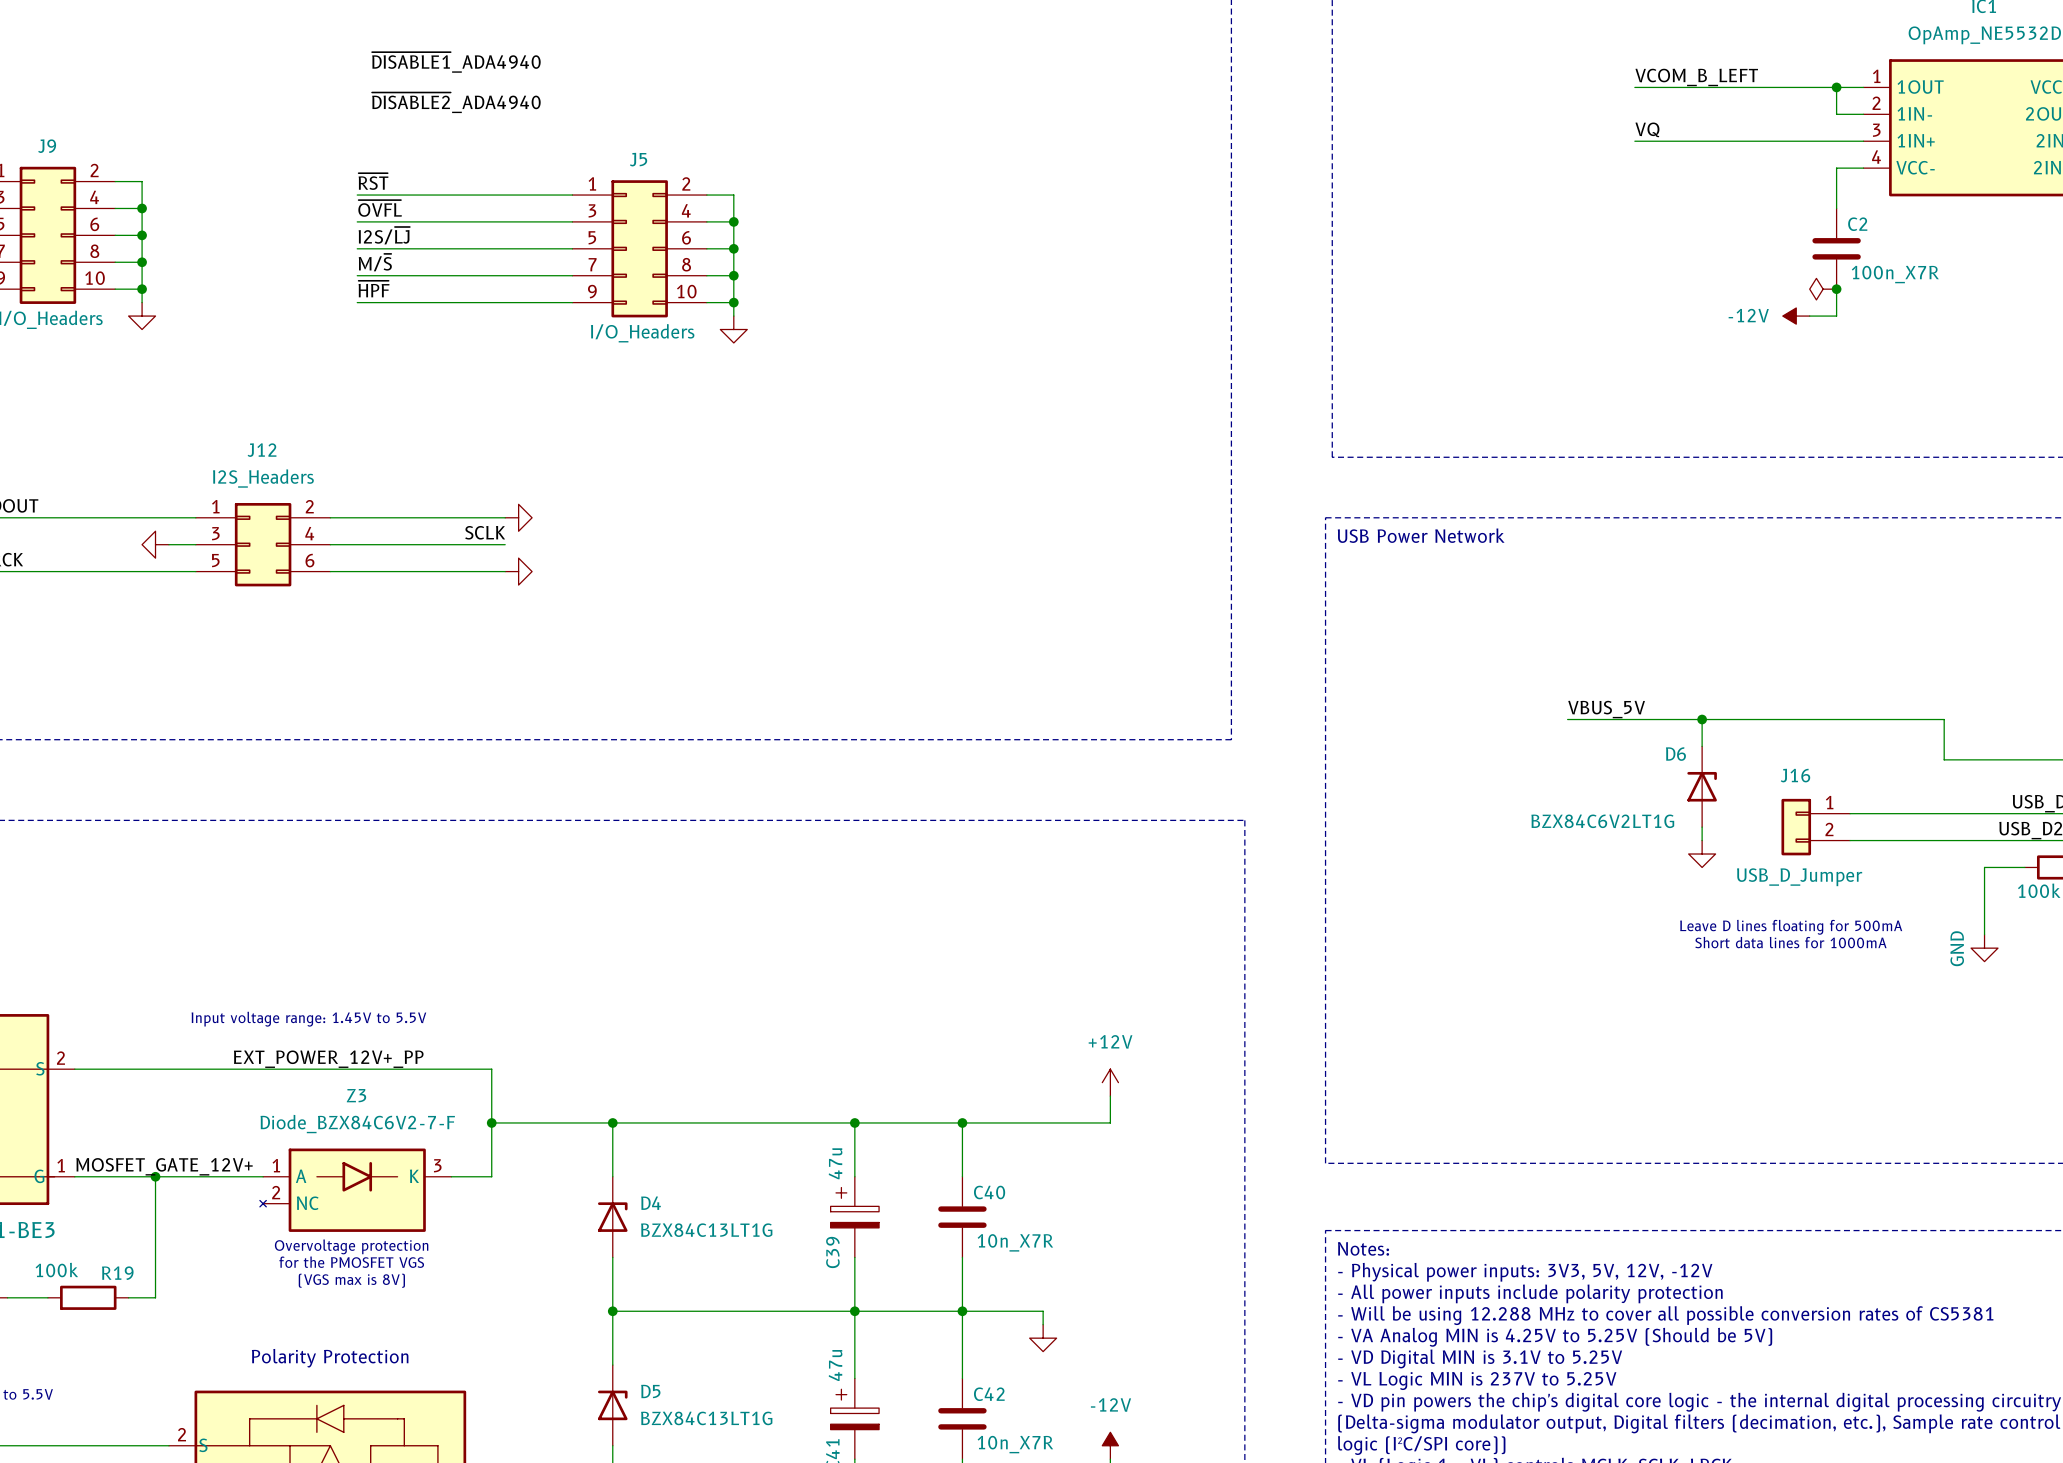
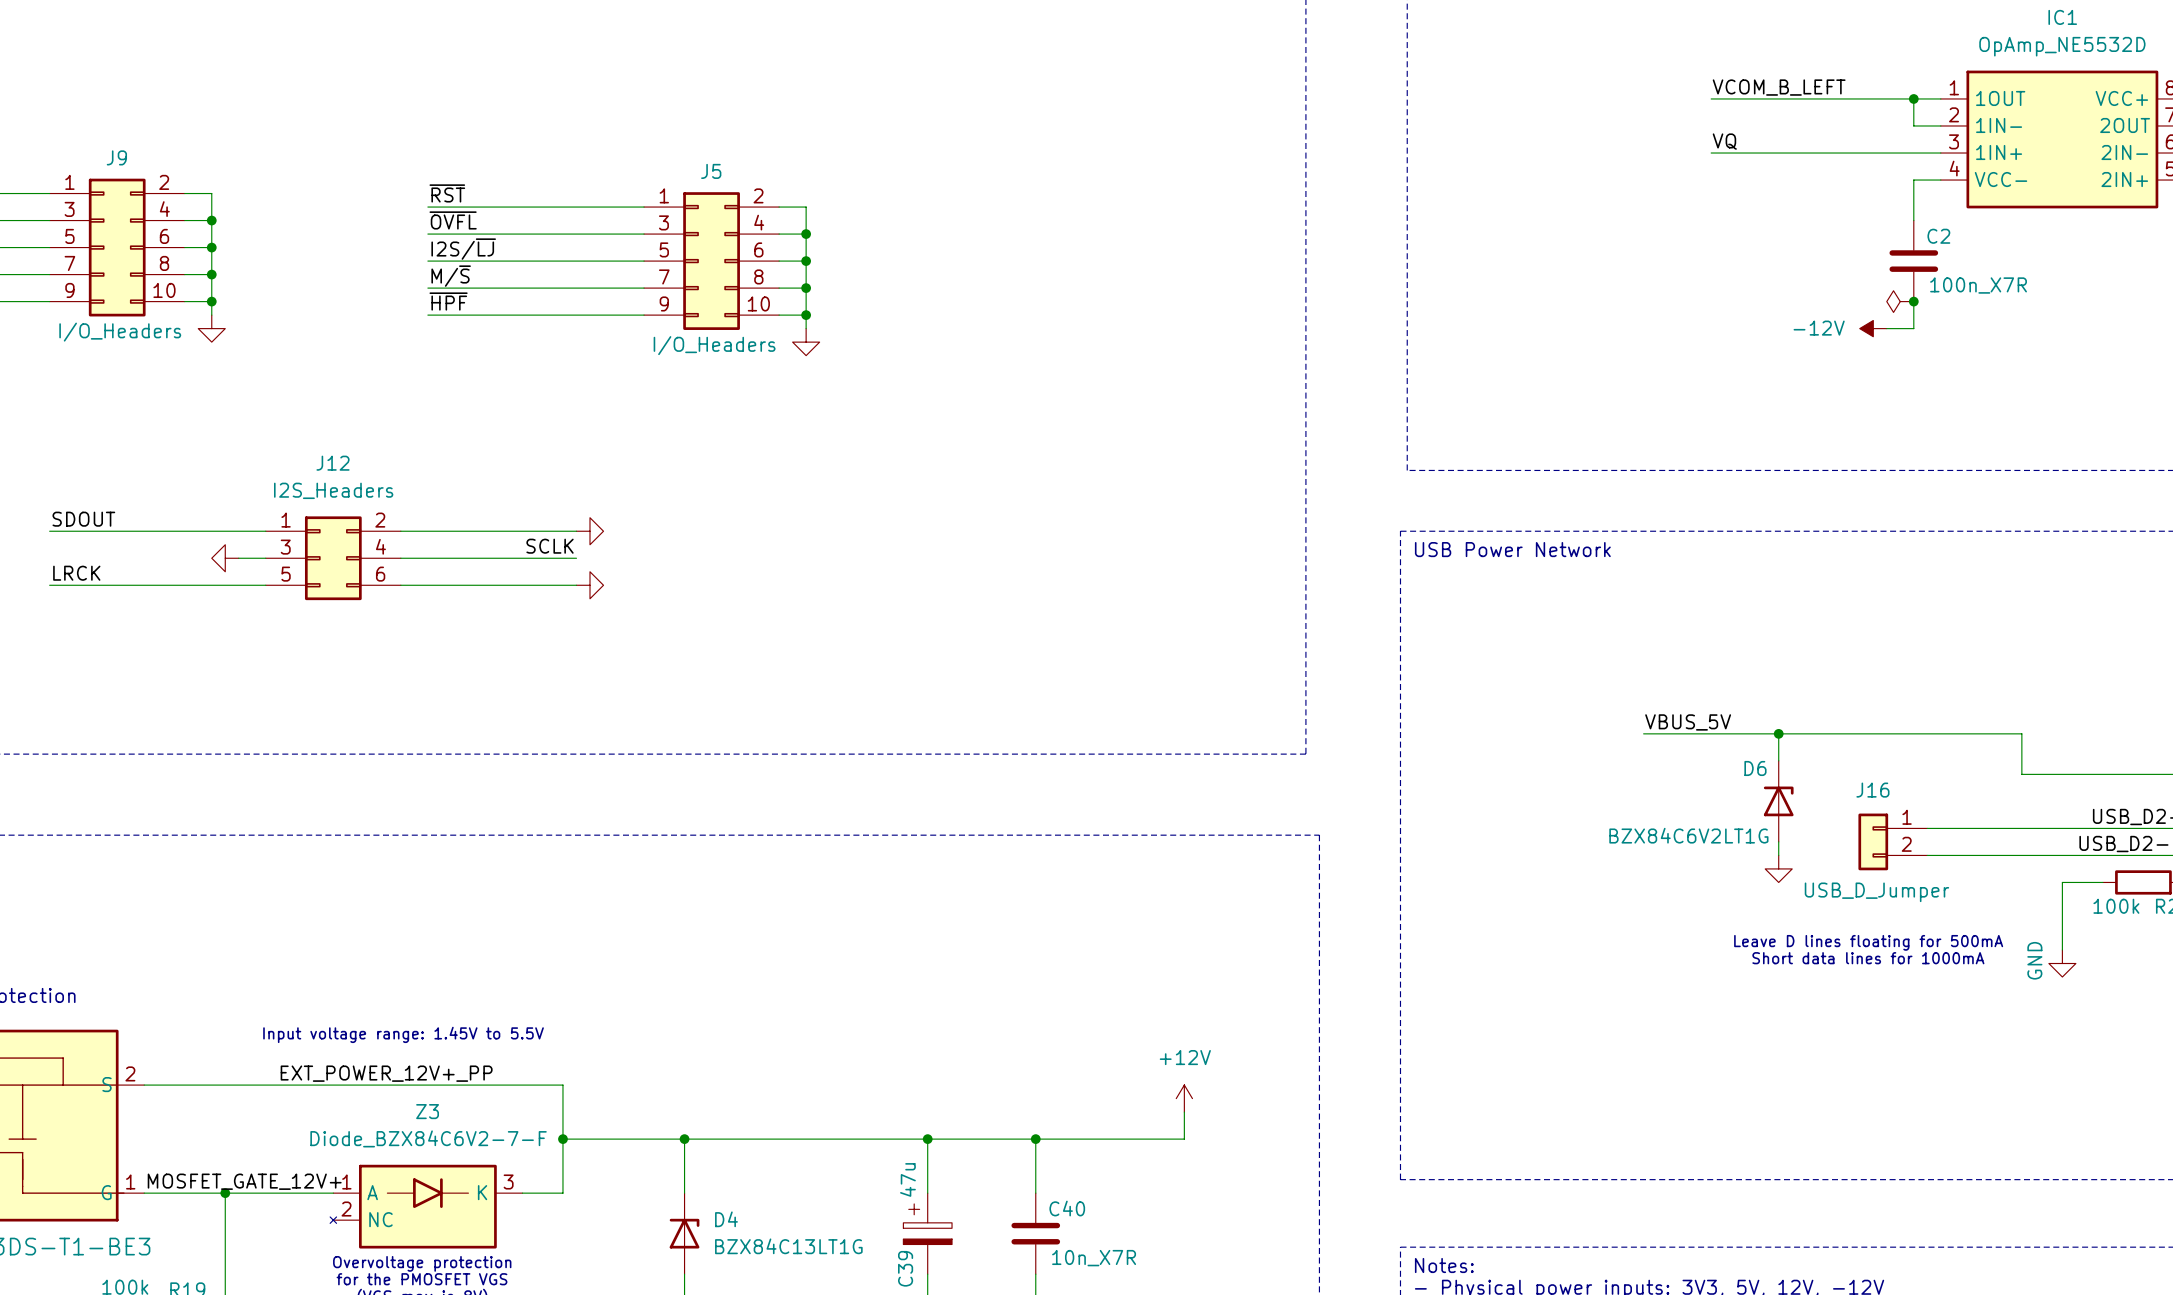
label: ~{DISABLE1}_ADA4940 (456, 62) -> none
label: ~{DISABLE2}_ADA4940 (456, 102) -> none

